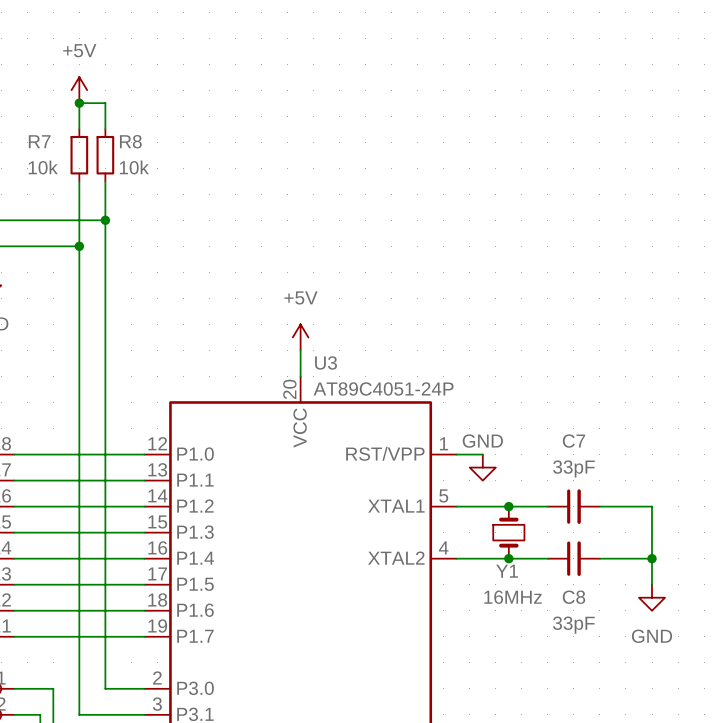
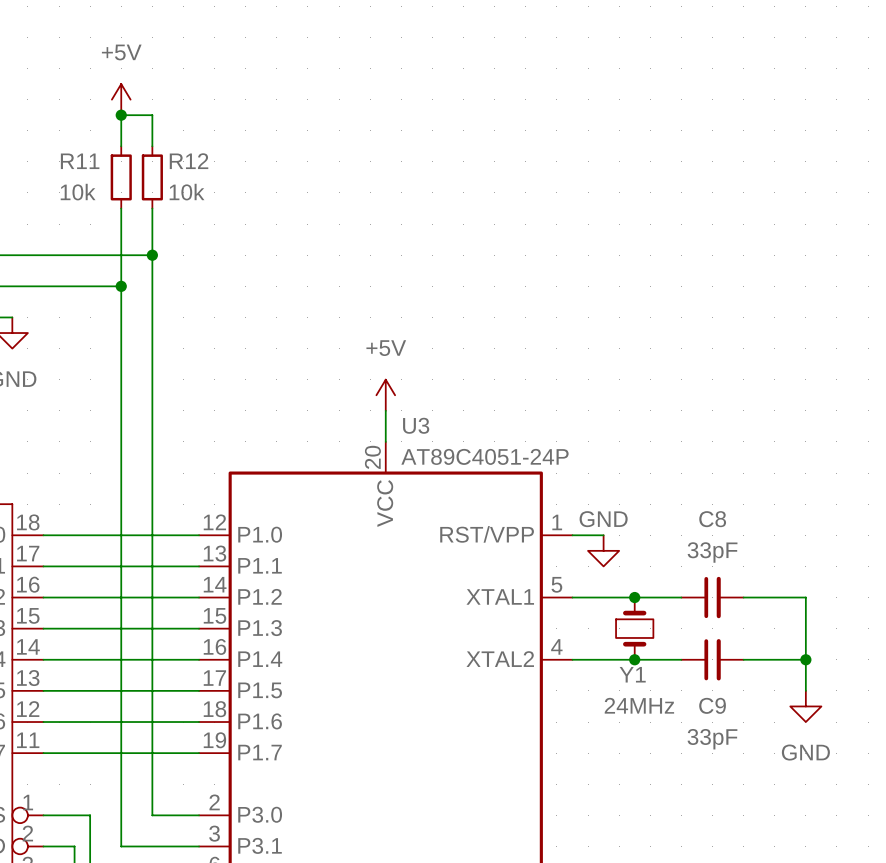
R7 name: R7 (39, 141) -> R11 (80, 161)
R8 name: R8 (130, 141) -> R12 (189, 161)
C7 name: C7 (573, 441) -> C8 (712, 519)
Y1 value: 16MHz (513, 597) -> 24MHz (639, 705)
C8 name: C8 (573, 597) -> C9 (712, 705)

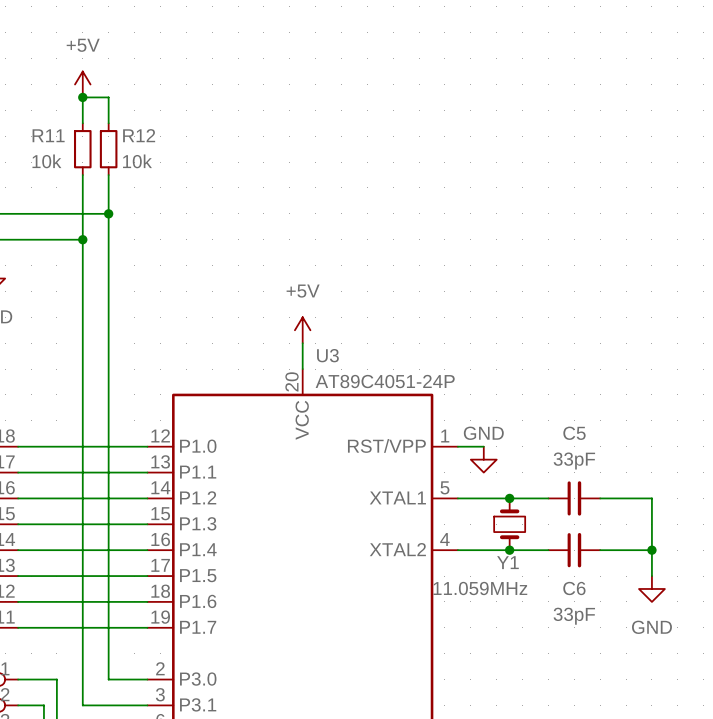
C8 name: C8 (712, 519) -> C5 (574, 433)
Y1 value: 24MHz (639, 705) -> 11.059MHz (480, 588)
C9 name: C9 (712, 705) -> C6 (574, 588)

